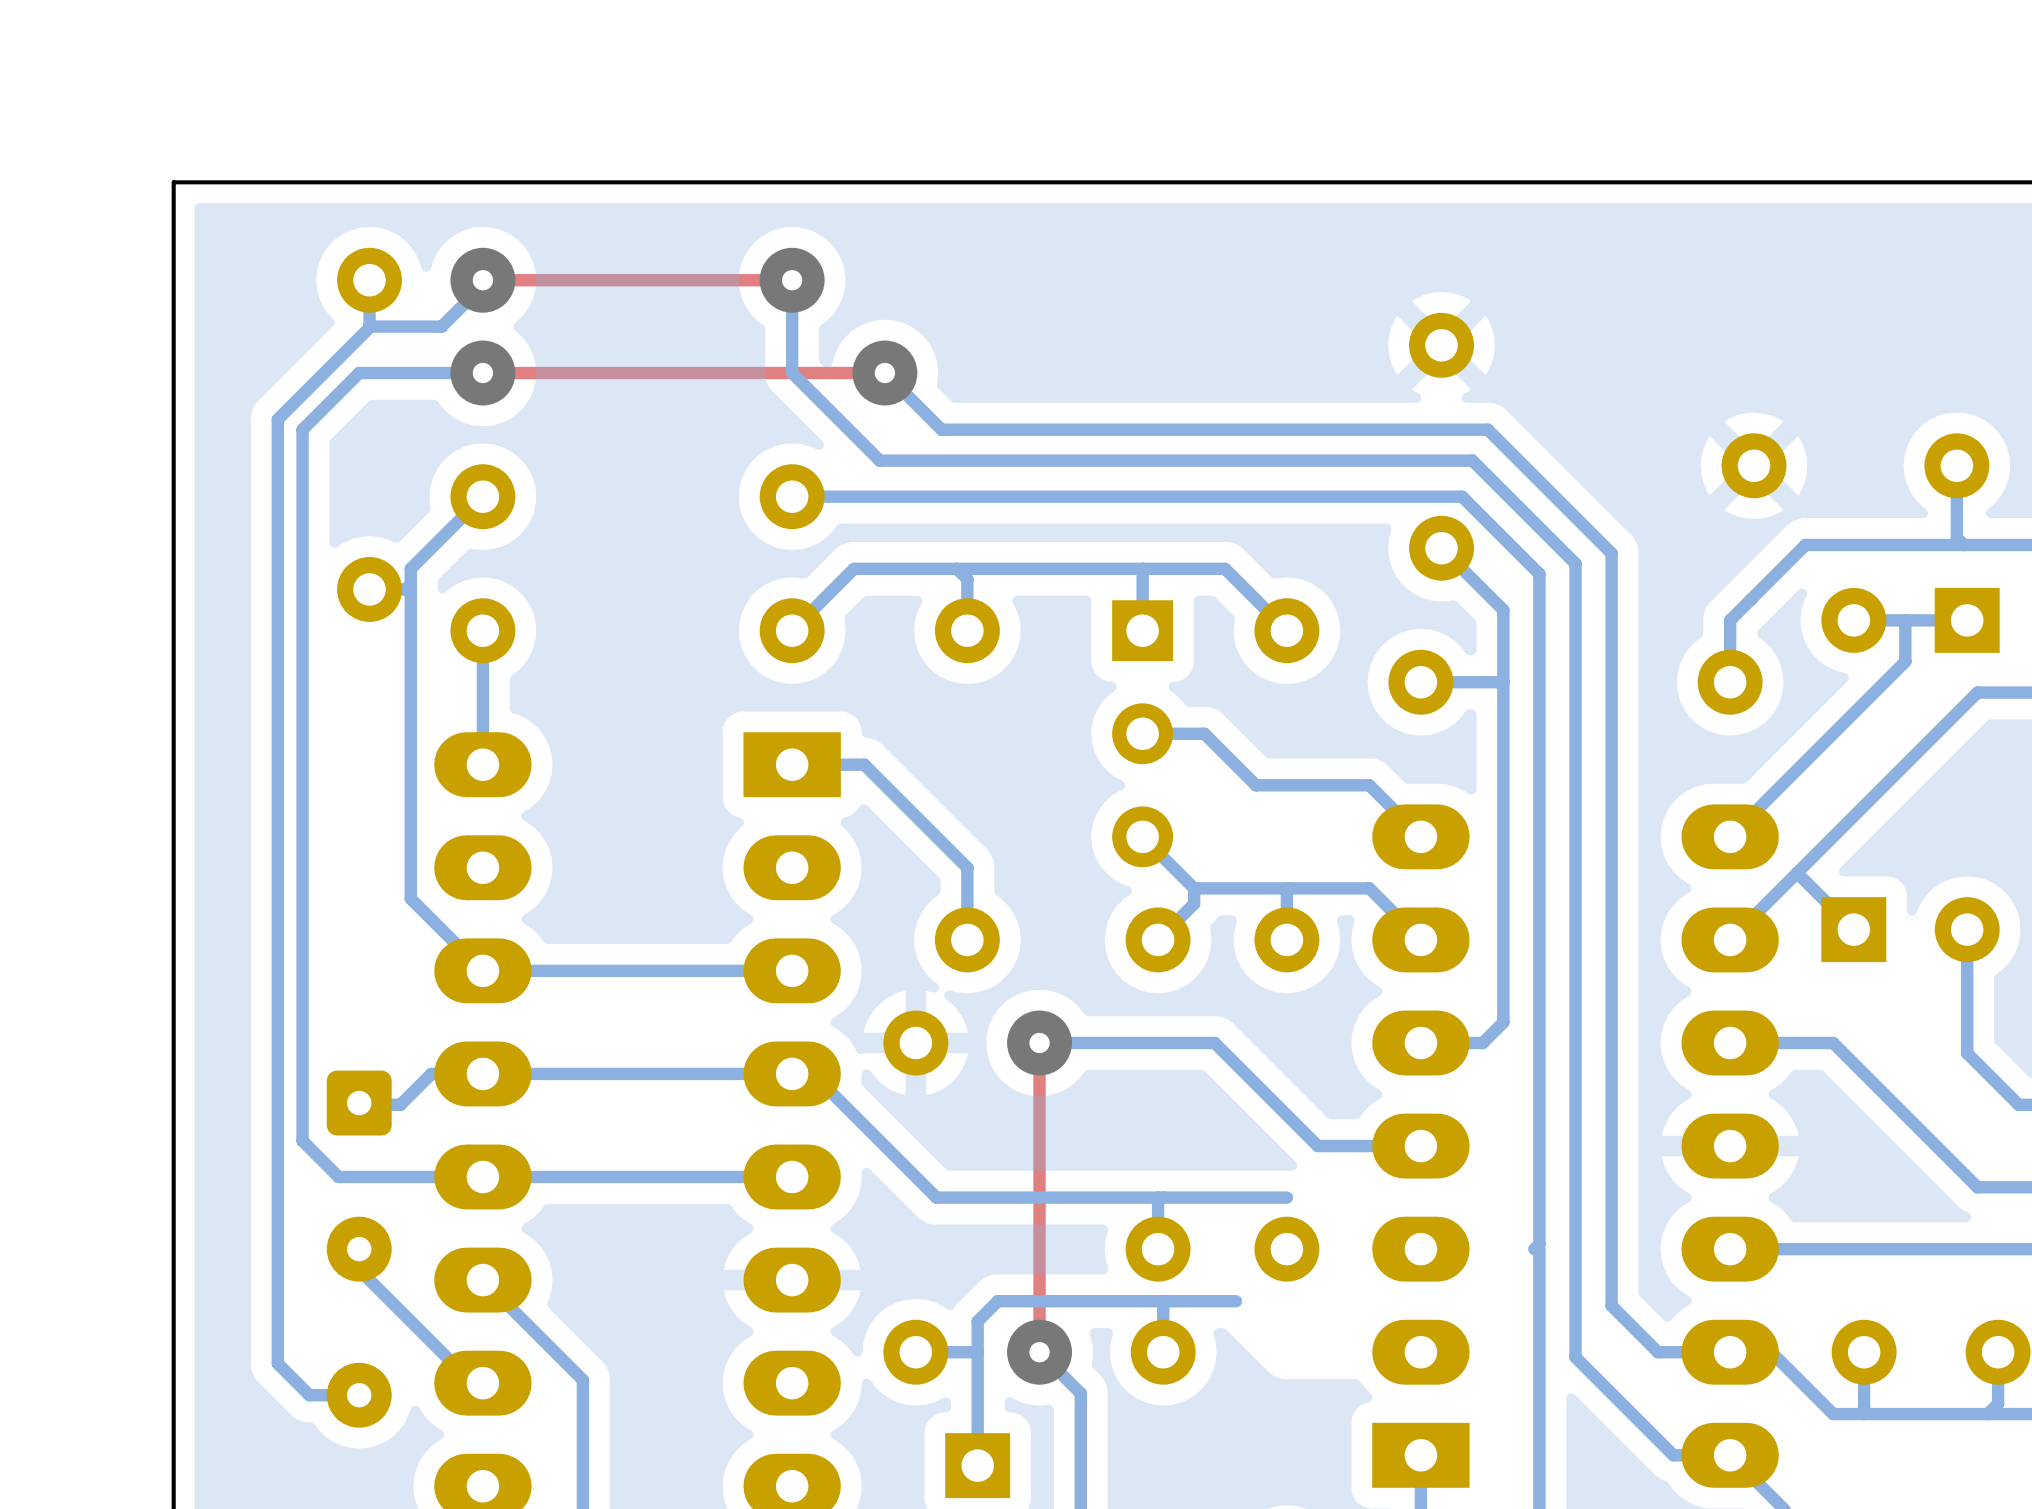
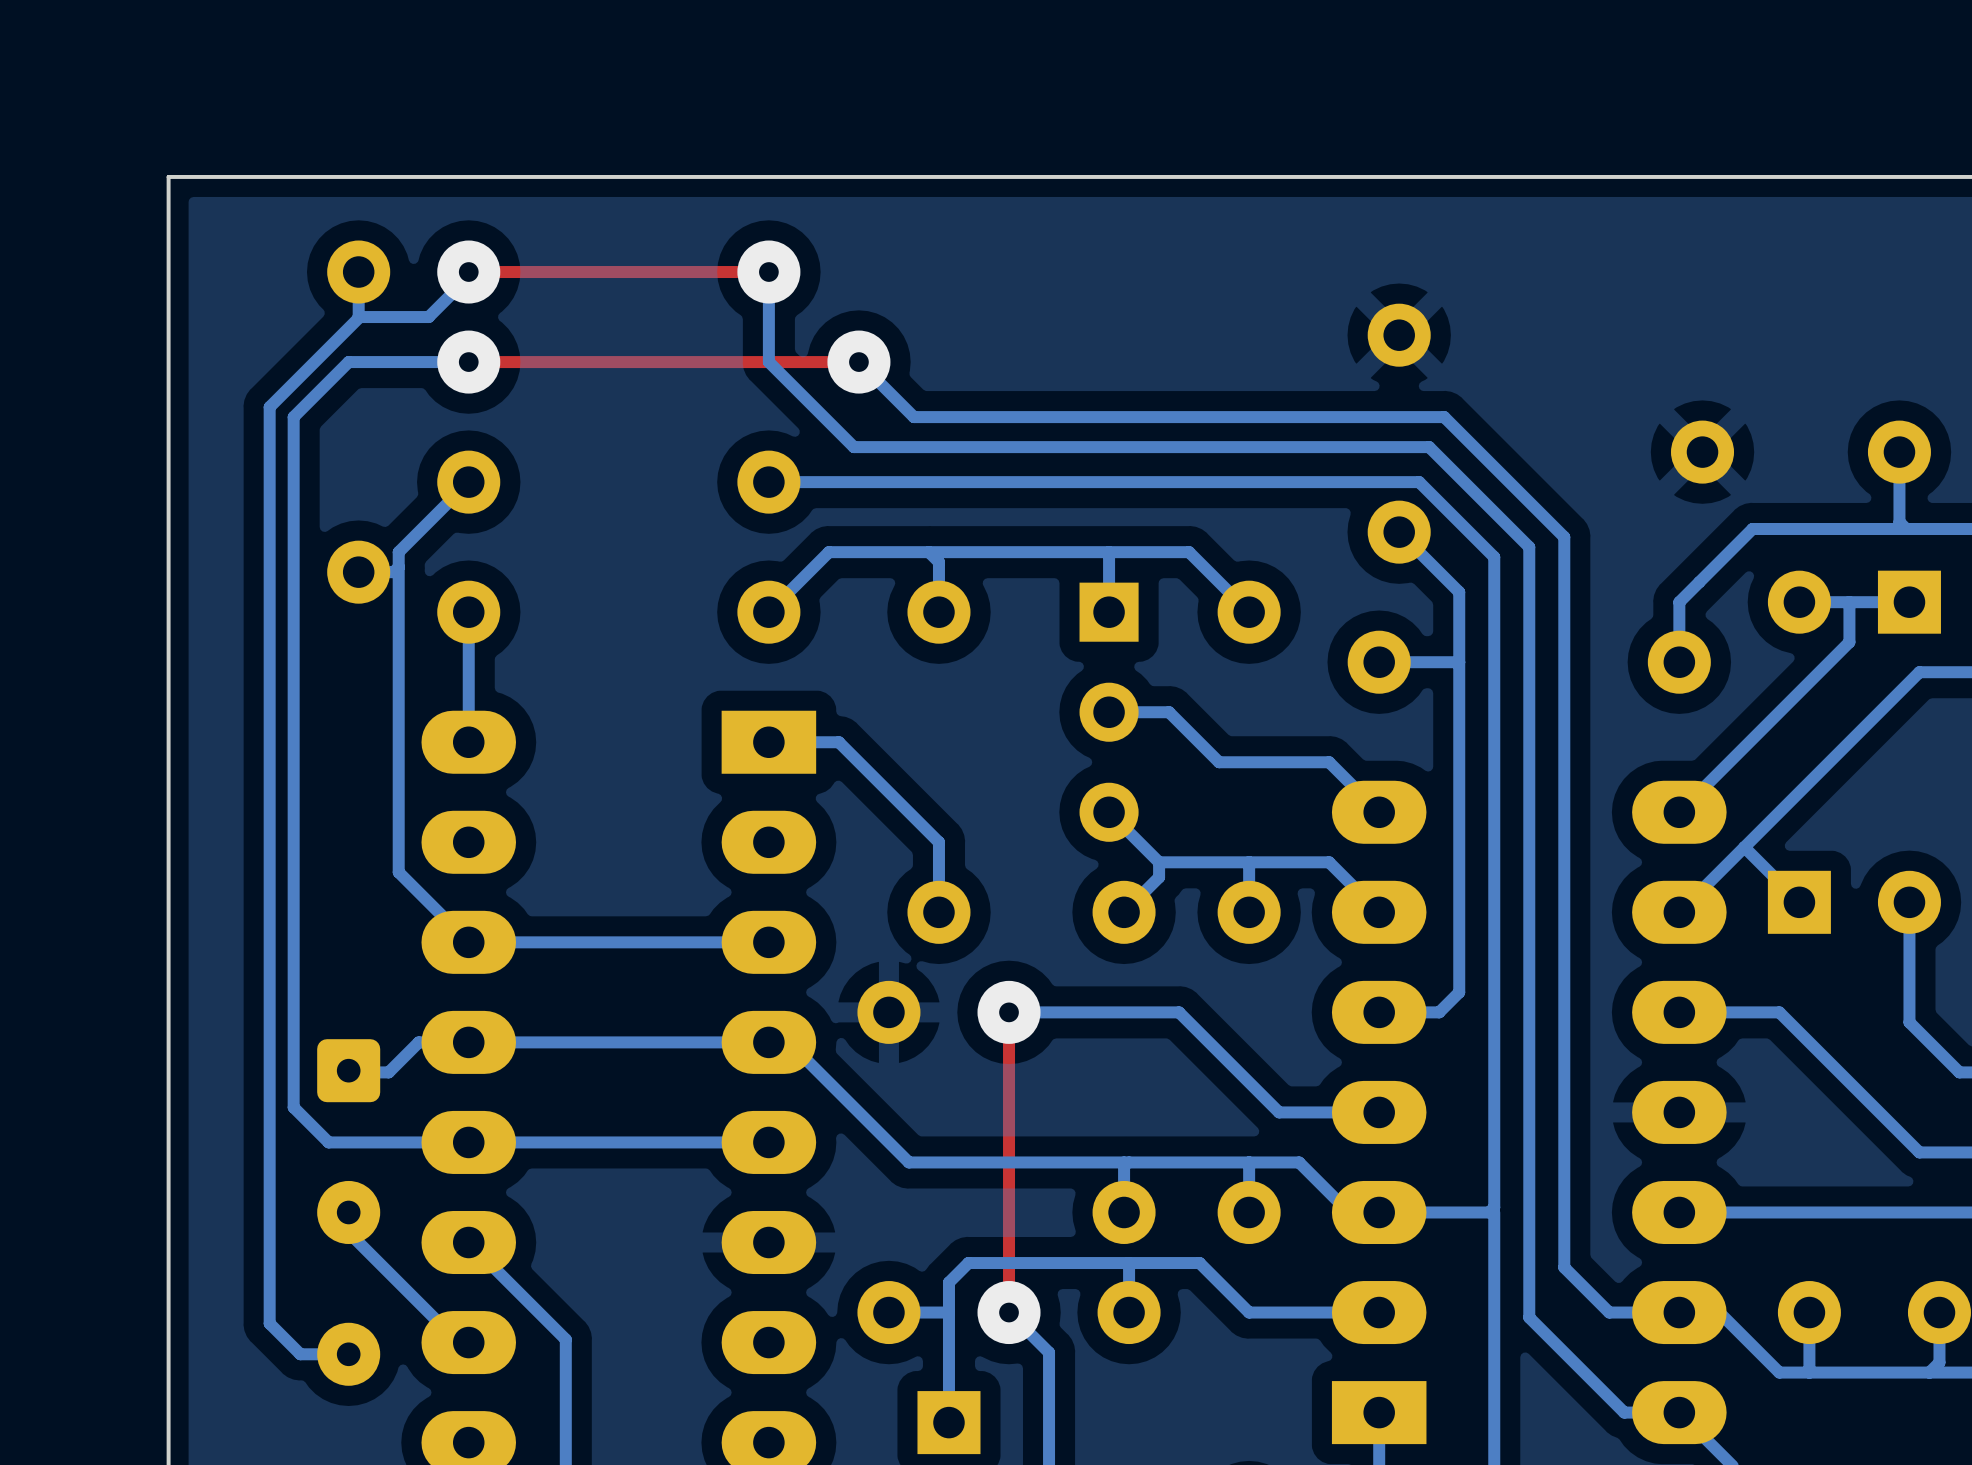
bottom track: none -> (1349, 1212) (1299, 1162) (1249, 1162) (1249, 1212)
bottom track: none -> (1489, 1212) (1379, 1212)
bottom track: none -> (1199, 1263) (1249, 1312) (1379, 1312)

